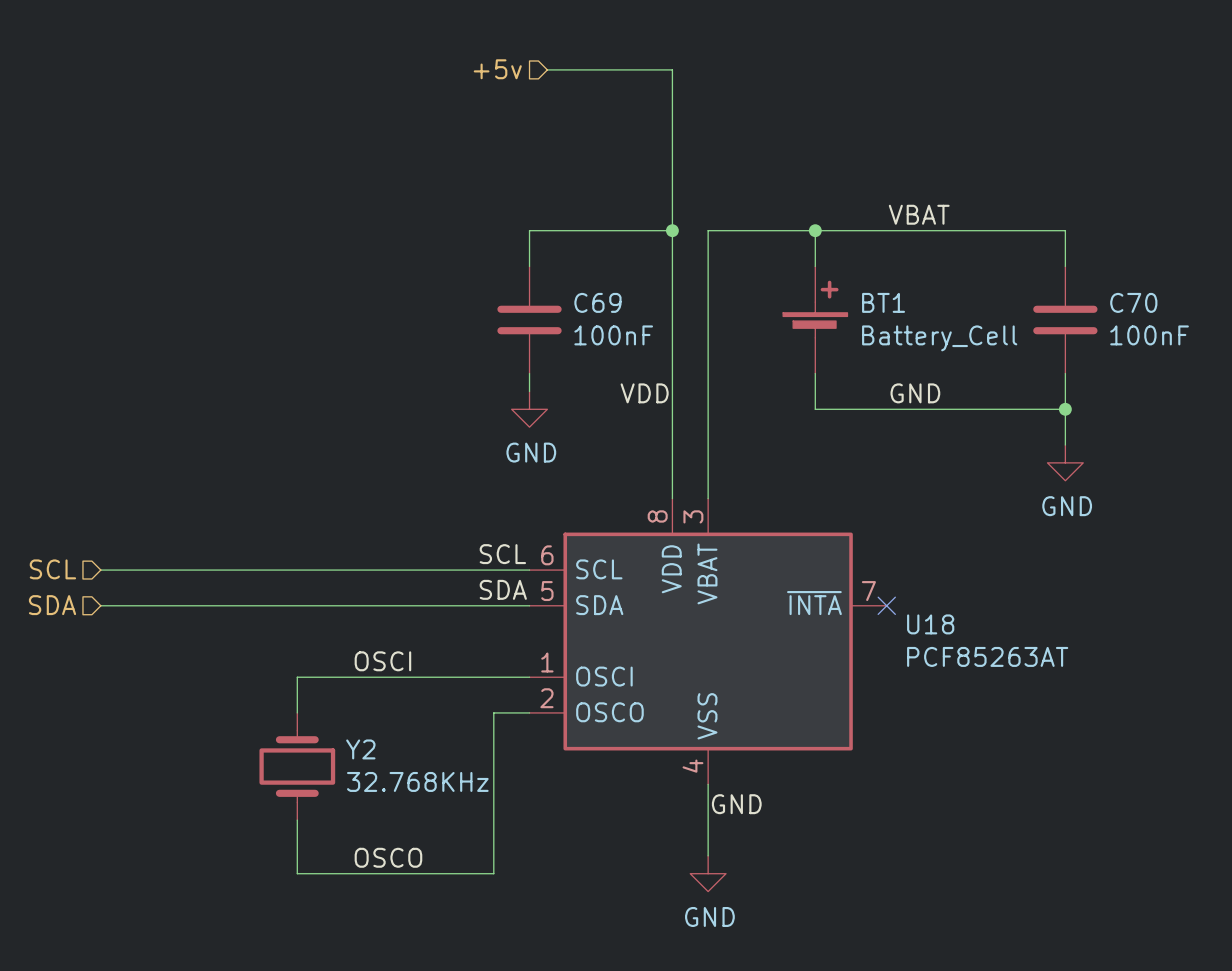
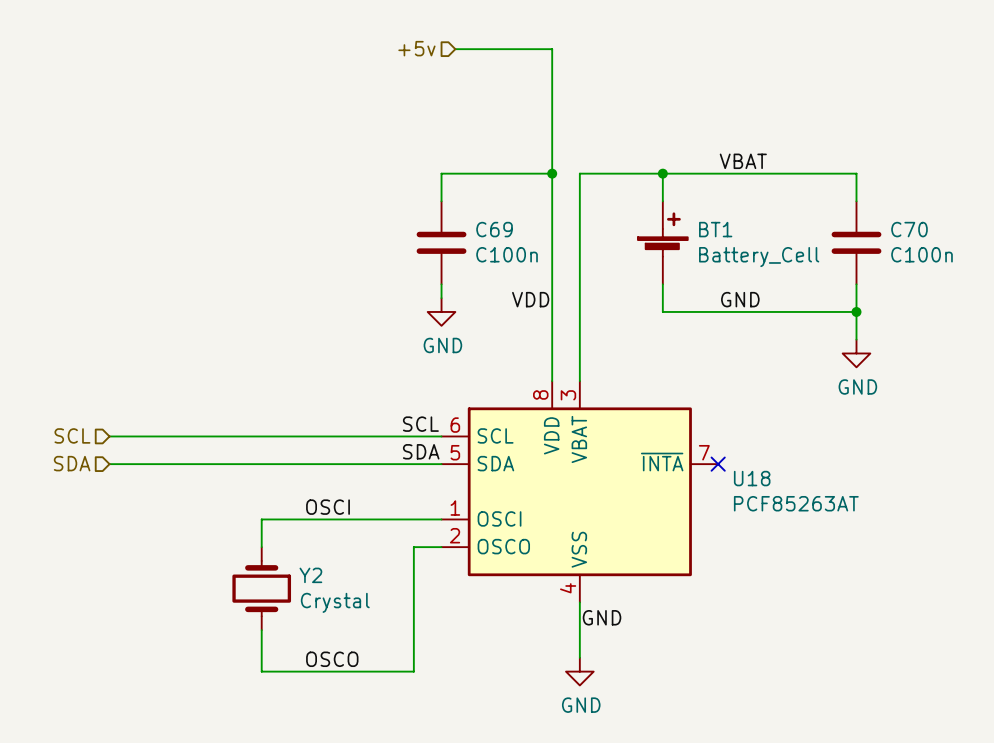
C69 value: 100nF (613, 335) -> C100n (507, 254)
C70 value: 100nF (1149, 335) -> C100n (922, 254)
Y2 value: 32.768KHz (417, 781) -> Crystal (335, 602)

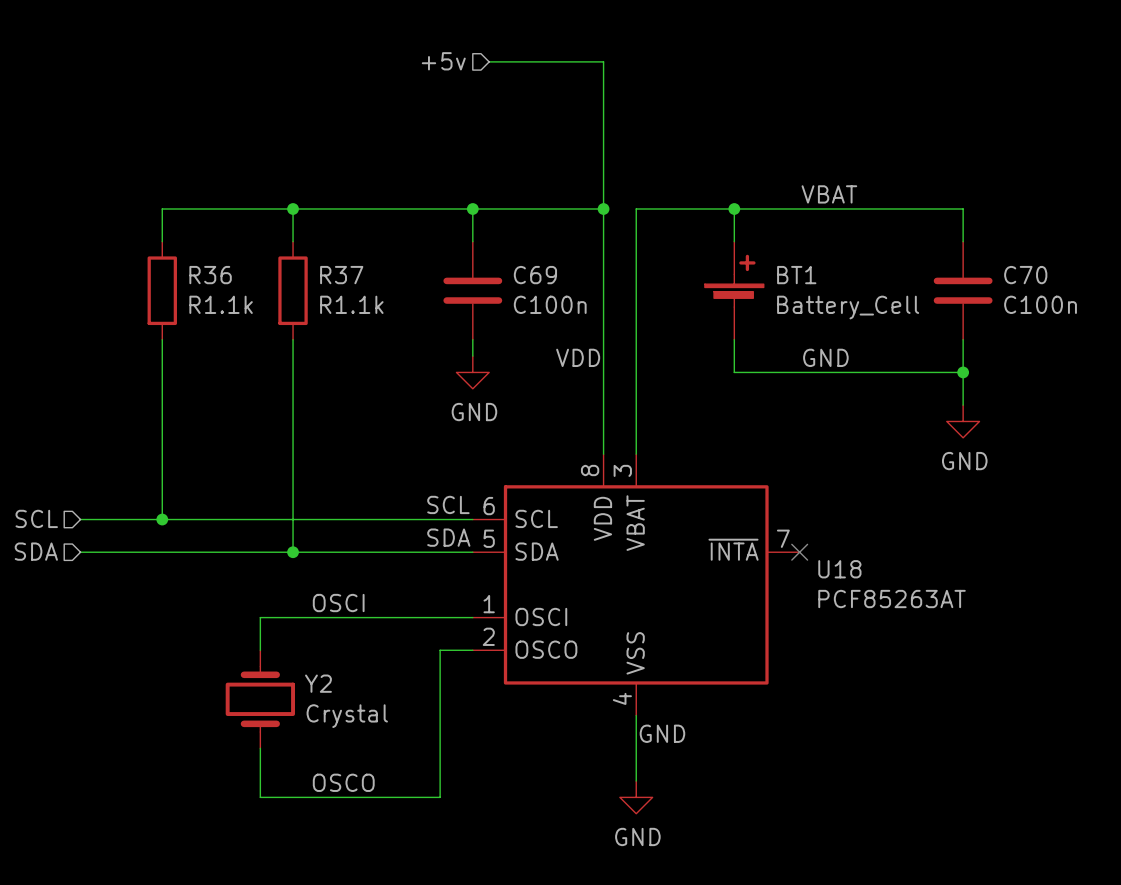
wire: none -> (293, 209) (293, 241)
junction: none -> (293, 209)
wire: none -> (472, 209) (162, 209) (162, 241)
junction: none -> (472, 209)
R36: none -> R1.1k (162, 290)
R37: none -> R1.1k (293, 290)
wire: none -> (162, 339) (162, 519)
wire: none -> (293, 339) (293, 552)
junction: none -> (162, 519)
junction: none -> (293, 552)

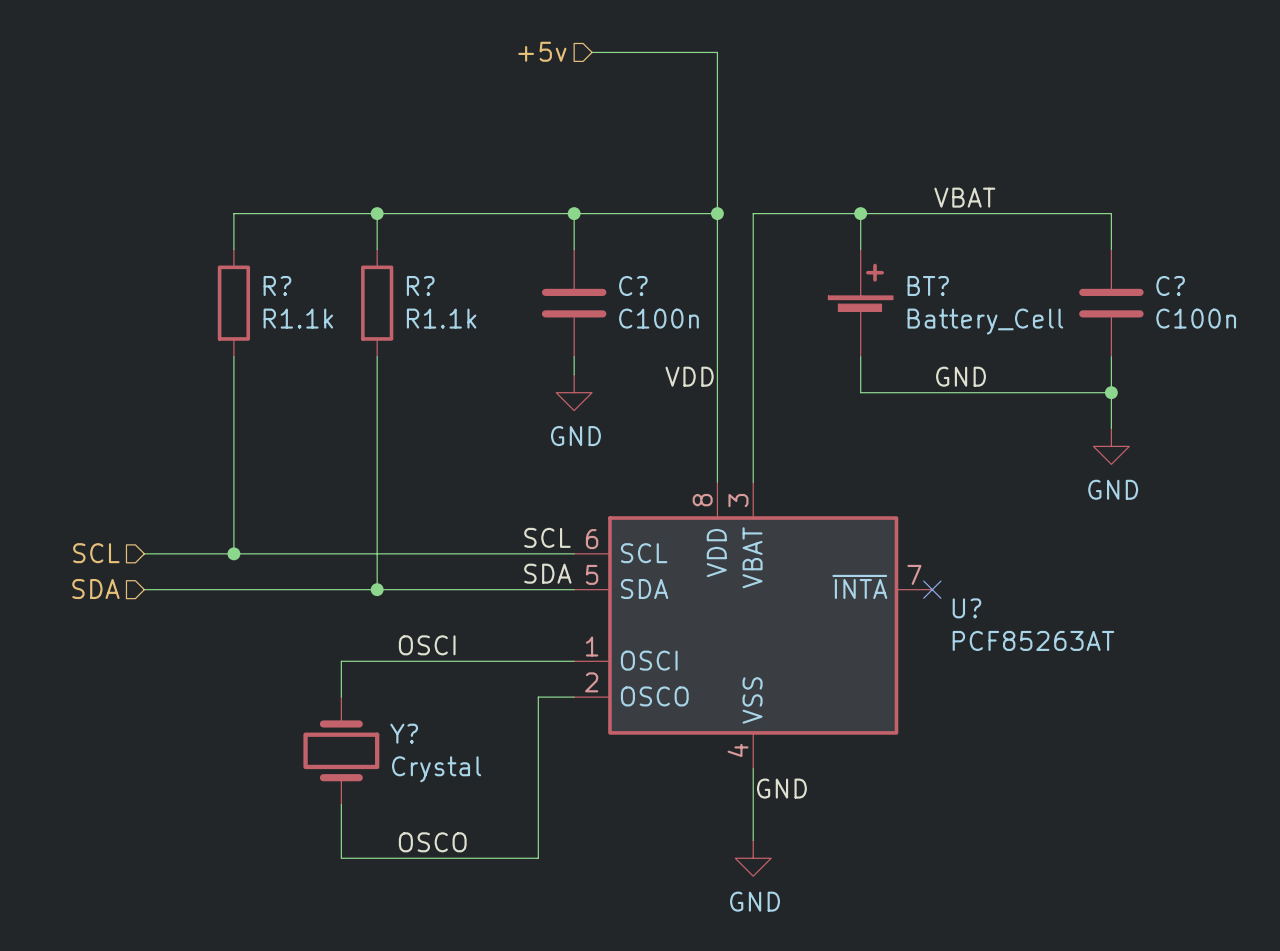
R36 name: R36 (210, 275) -> R? (277, 286)
R37 name: R37 (341, 275) -> R? (420, 286)
C69 name: C69 (535, 275) -> C? (633, 286)
BT1 name: BT1 (796, 275) -> BT? (928, 286)
C70 name: C70 (1025, 275) -> C? (1170, 286)
U18 name: U18 (839, 569) -> U? (966, 608)
Y2 name: Y2 (318, 683) -> Y? (404, 733)

